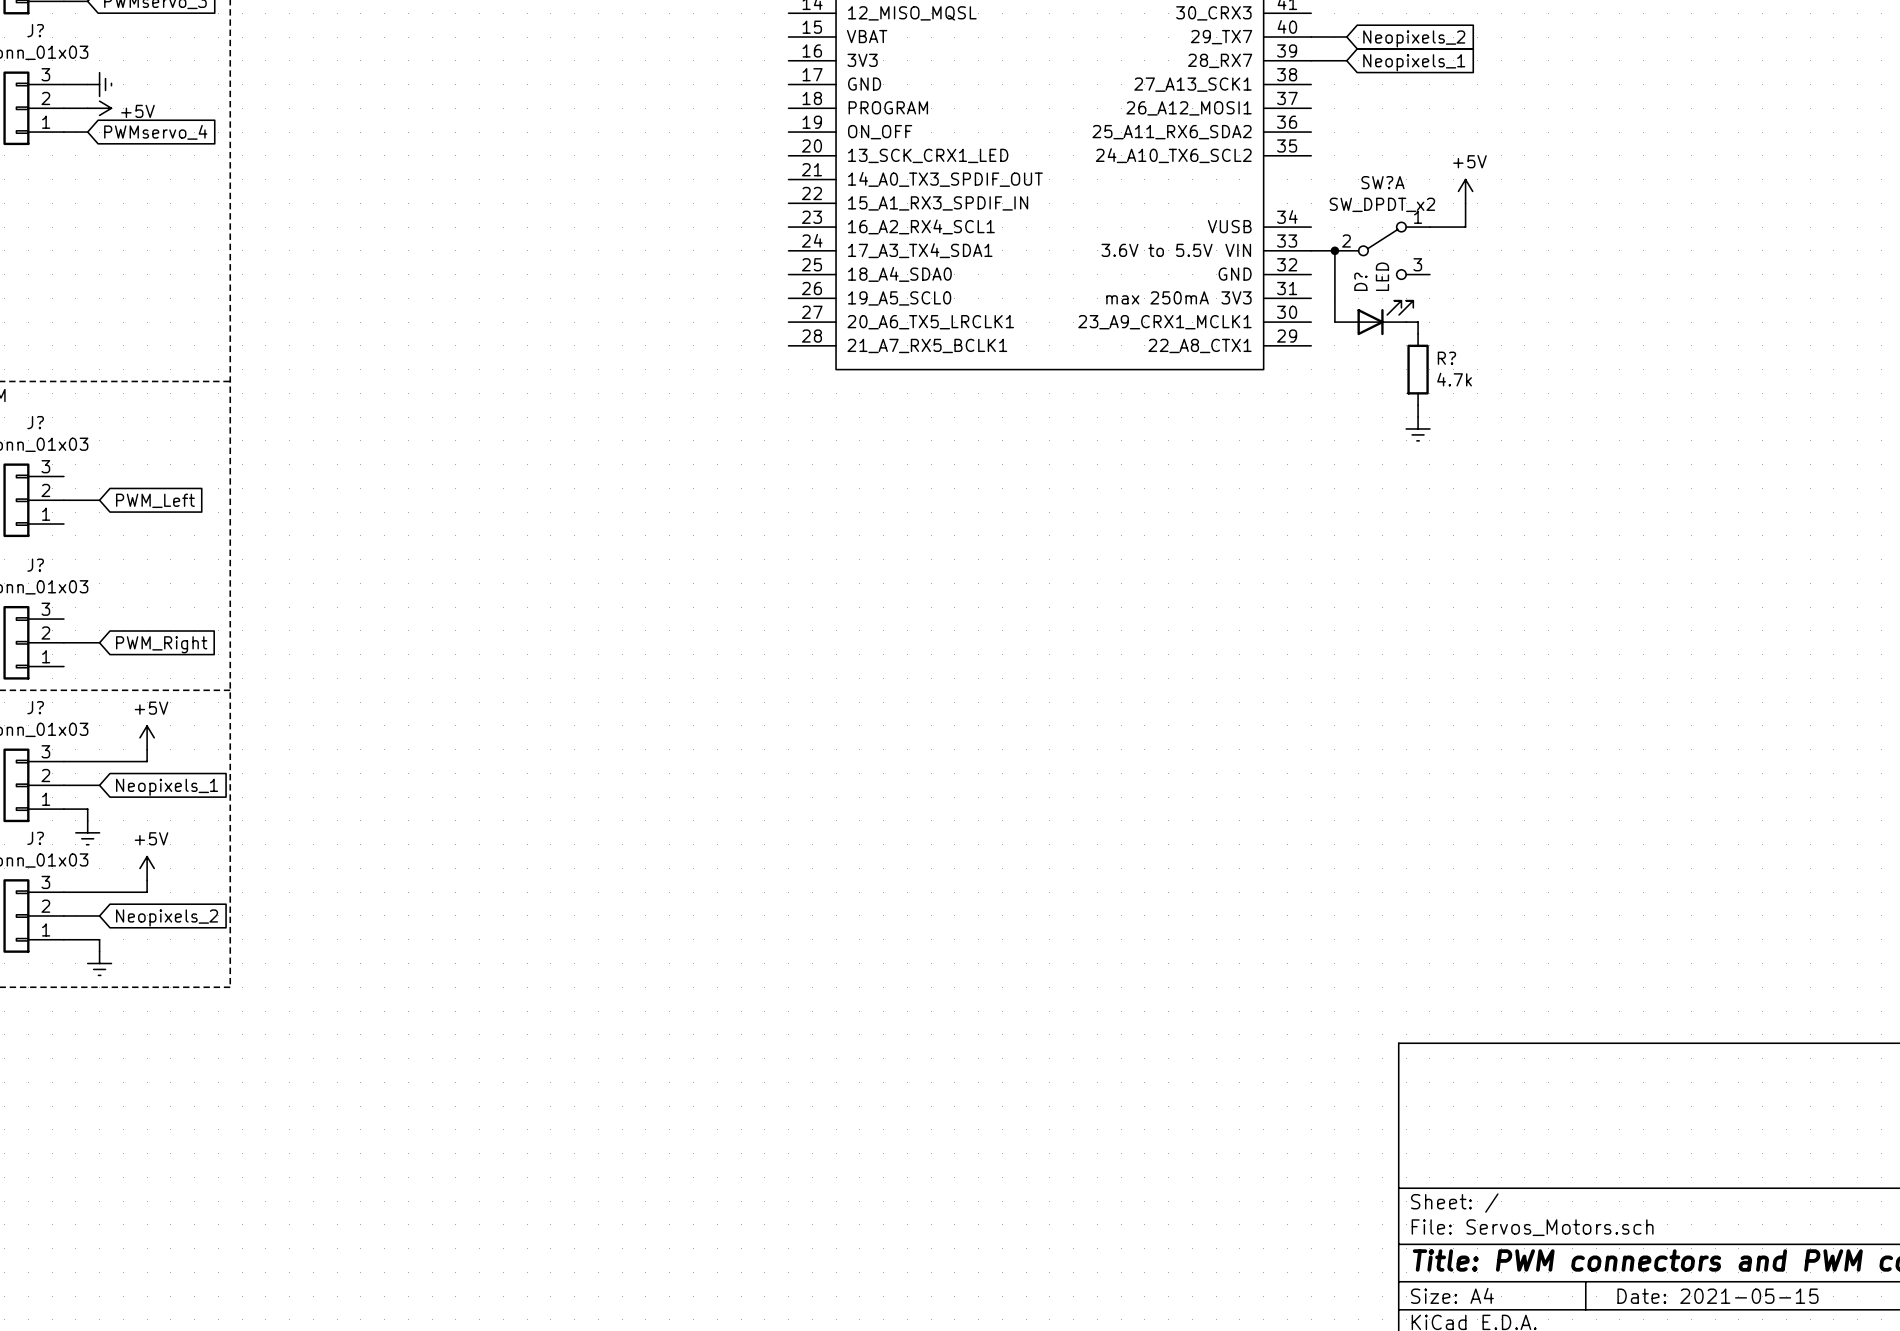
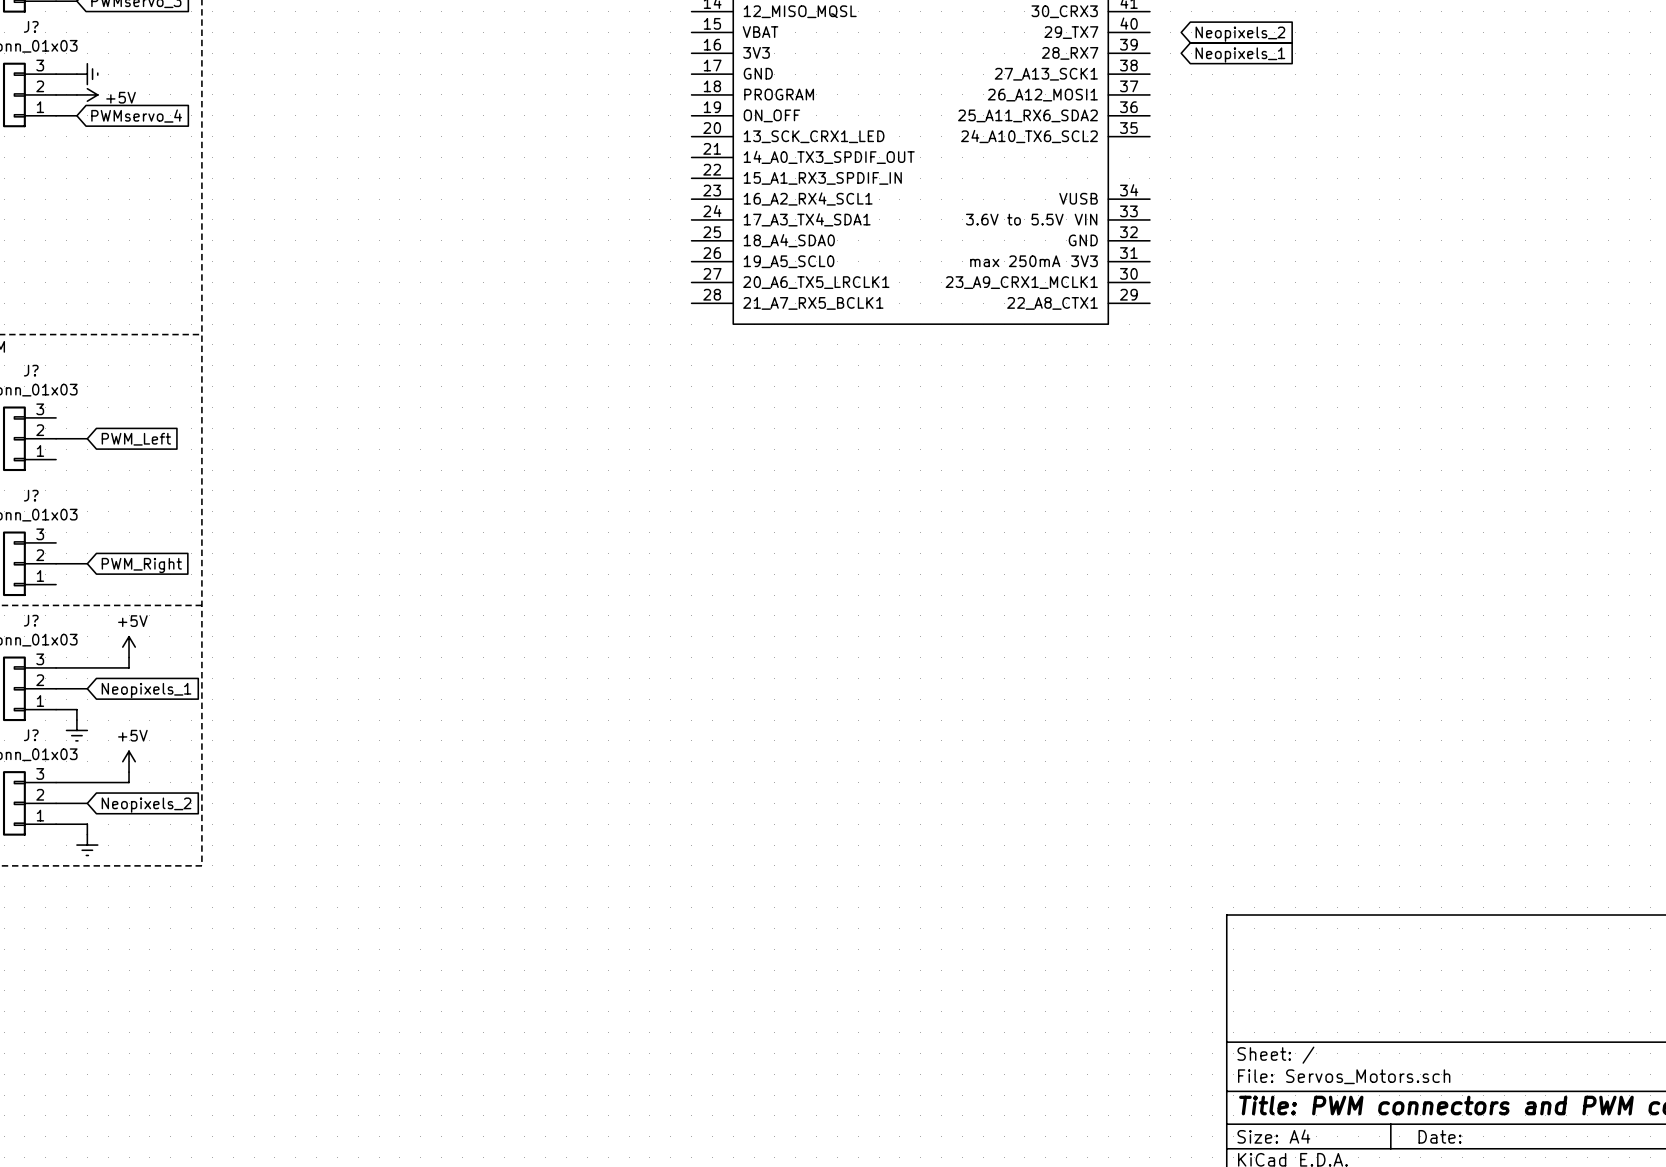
wire: (1311, 37) (1346, 37) -> none
wire: (1311, 60) (1346, 60) -> none
power symbol: +5V (1465, 191) -> none
wire: (1465, 203) (1465, 227) (1429, 227) -> none
wire: (1311, 250) (1334, 250) (1334, 322) -> none
junction: (1334, 250) -> none
SW?A: SW_DPDT_x2 (1382, 250) -> none
D?: LED (1374, 317) -> none
wire: (1406, 322) (1418, 322) (1418, 333) -> none
R?: 4.7k (1418, 369) -> none
wire: (1418, 405) (1418, 417) -> none
power symbol: (1418, 428) -> none
title block: Date: 2021-05-15 (1717, 1296) -> Date: (1439, 1136)

